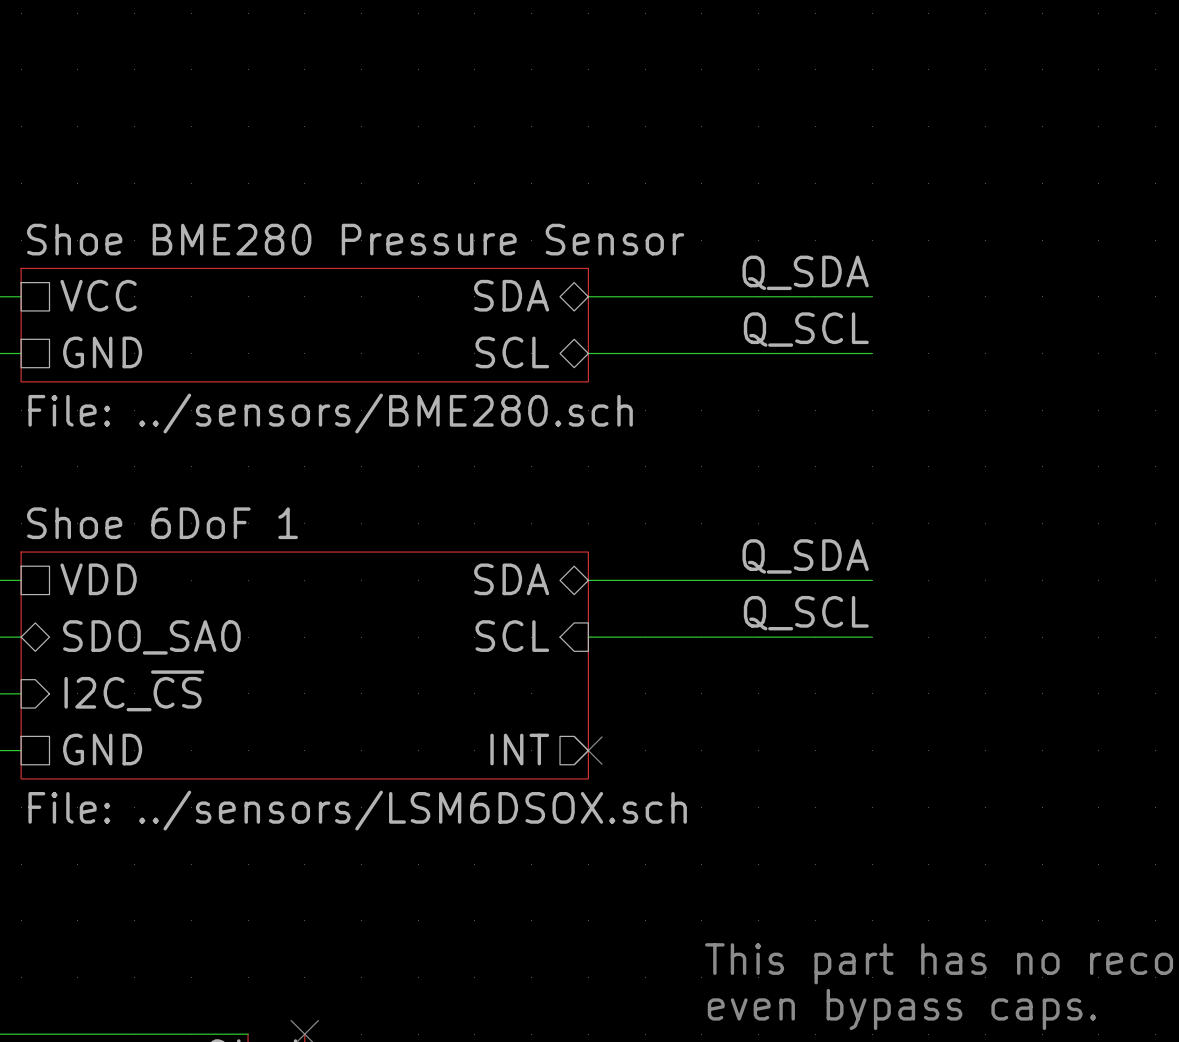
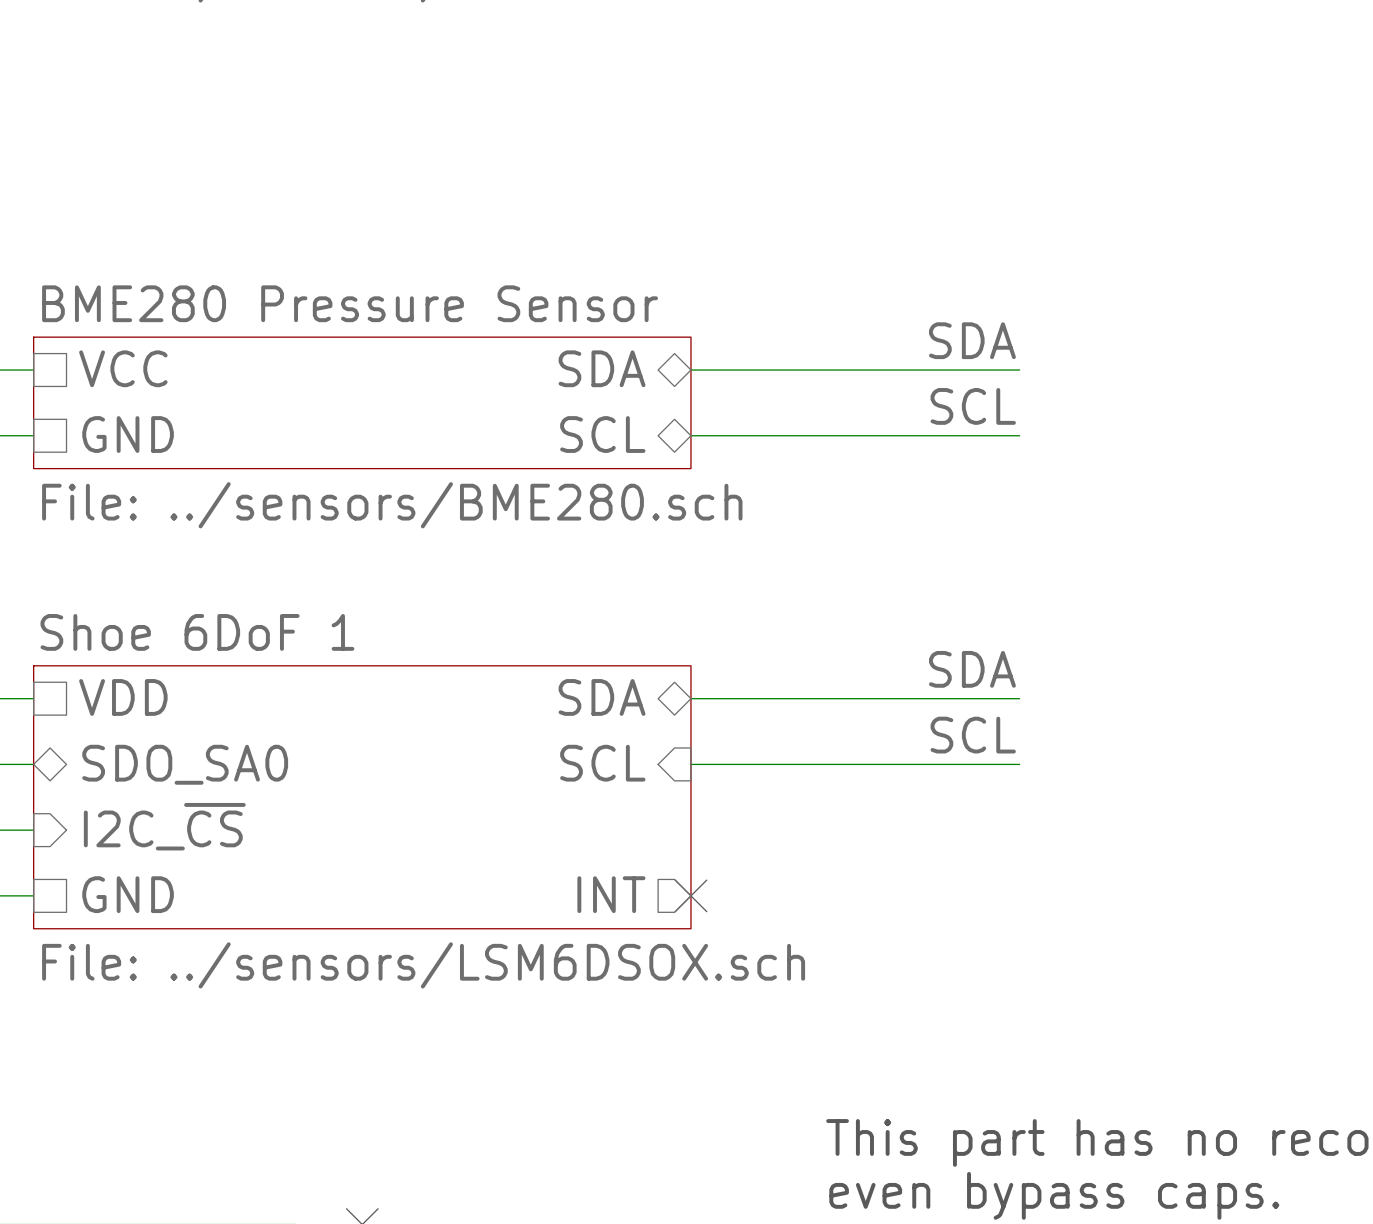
sheet Shoe BME280 Pressure Sensor name: Shoe BME280 Pressure Sensor (355, 239) -> BME280 Pressure Sensor (350, 303)
label: Q_SDA (805, 272) -> SDA (972, 340)
label: Q_SCL (806, 329) -> SCL (973, 406)
label: Q_SDA (805, 556) -> SDA (972, 669)
label: Q_SCL (806, 613) -> SCL (973, 735)

